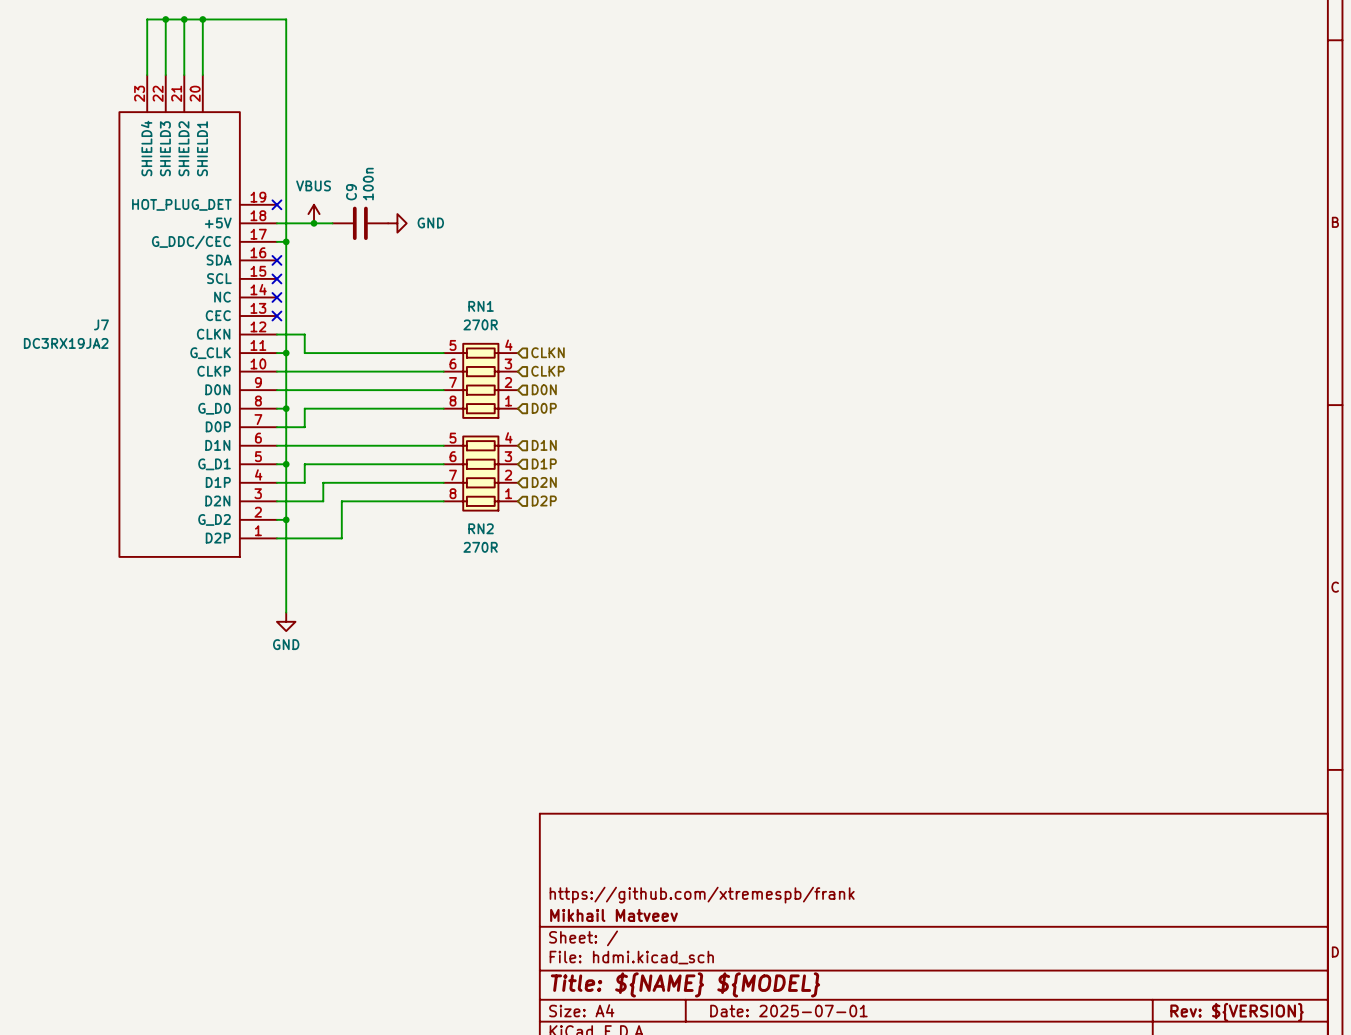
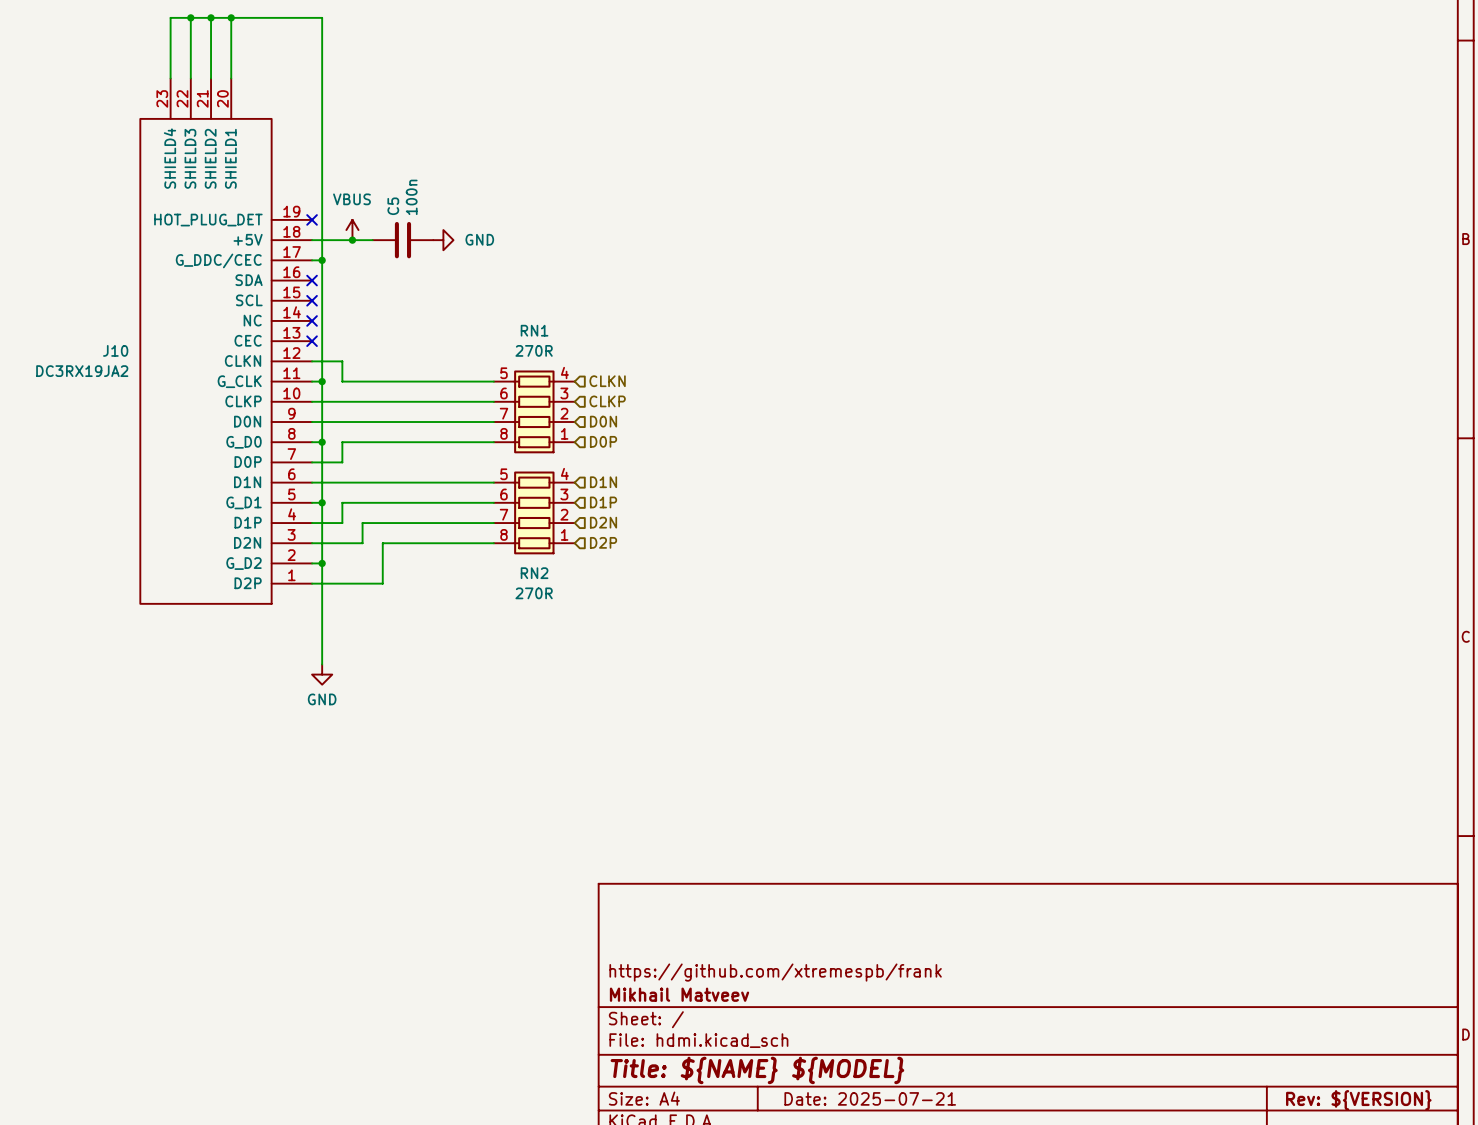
C9 name: C9 (351, 192) -> C5 (393, 206)
J7 name: J7 (101, 324) -> J10 (115, 350)
title block: Date: 2025-07-01 (788, 1011) -> Date: 2025-07-21 (870, 1098)

